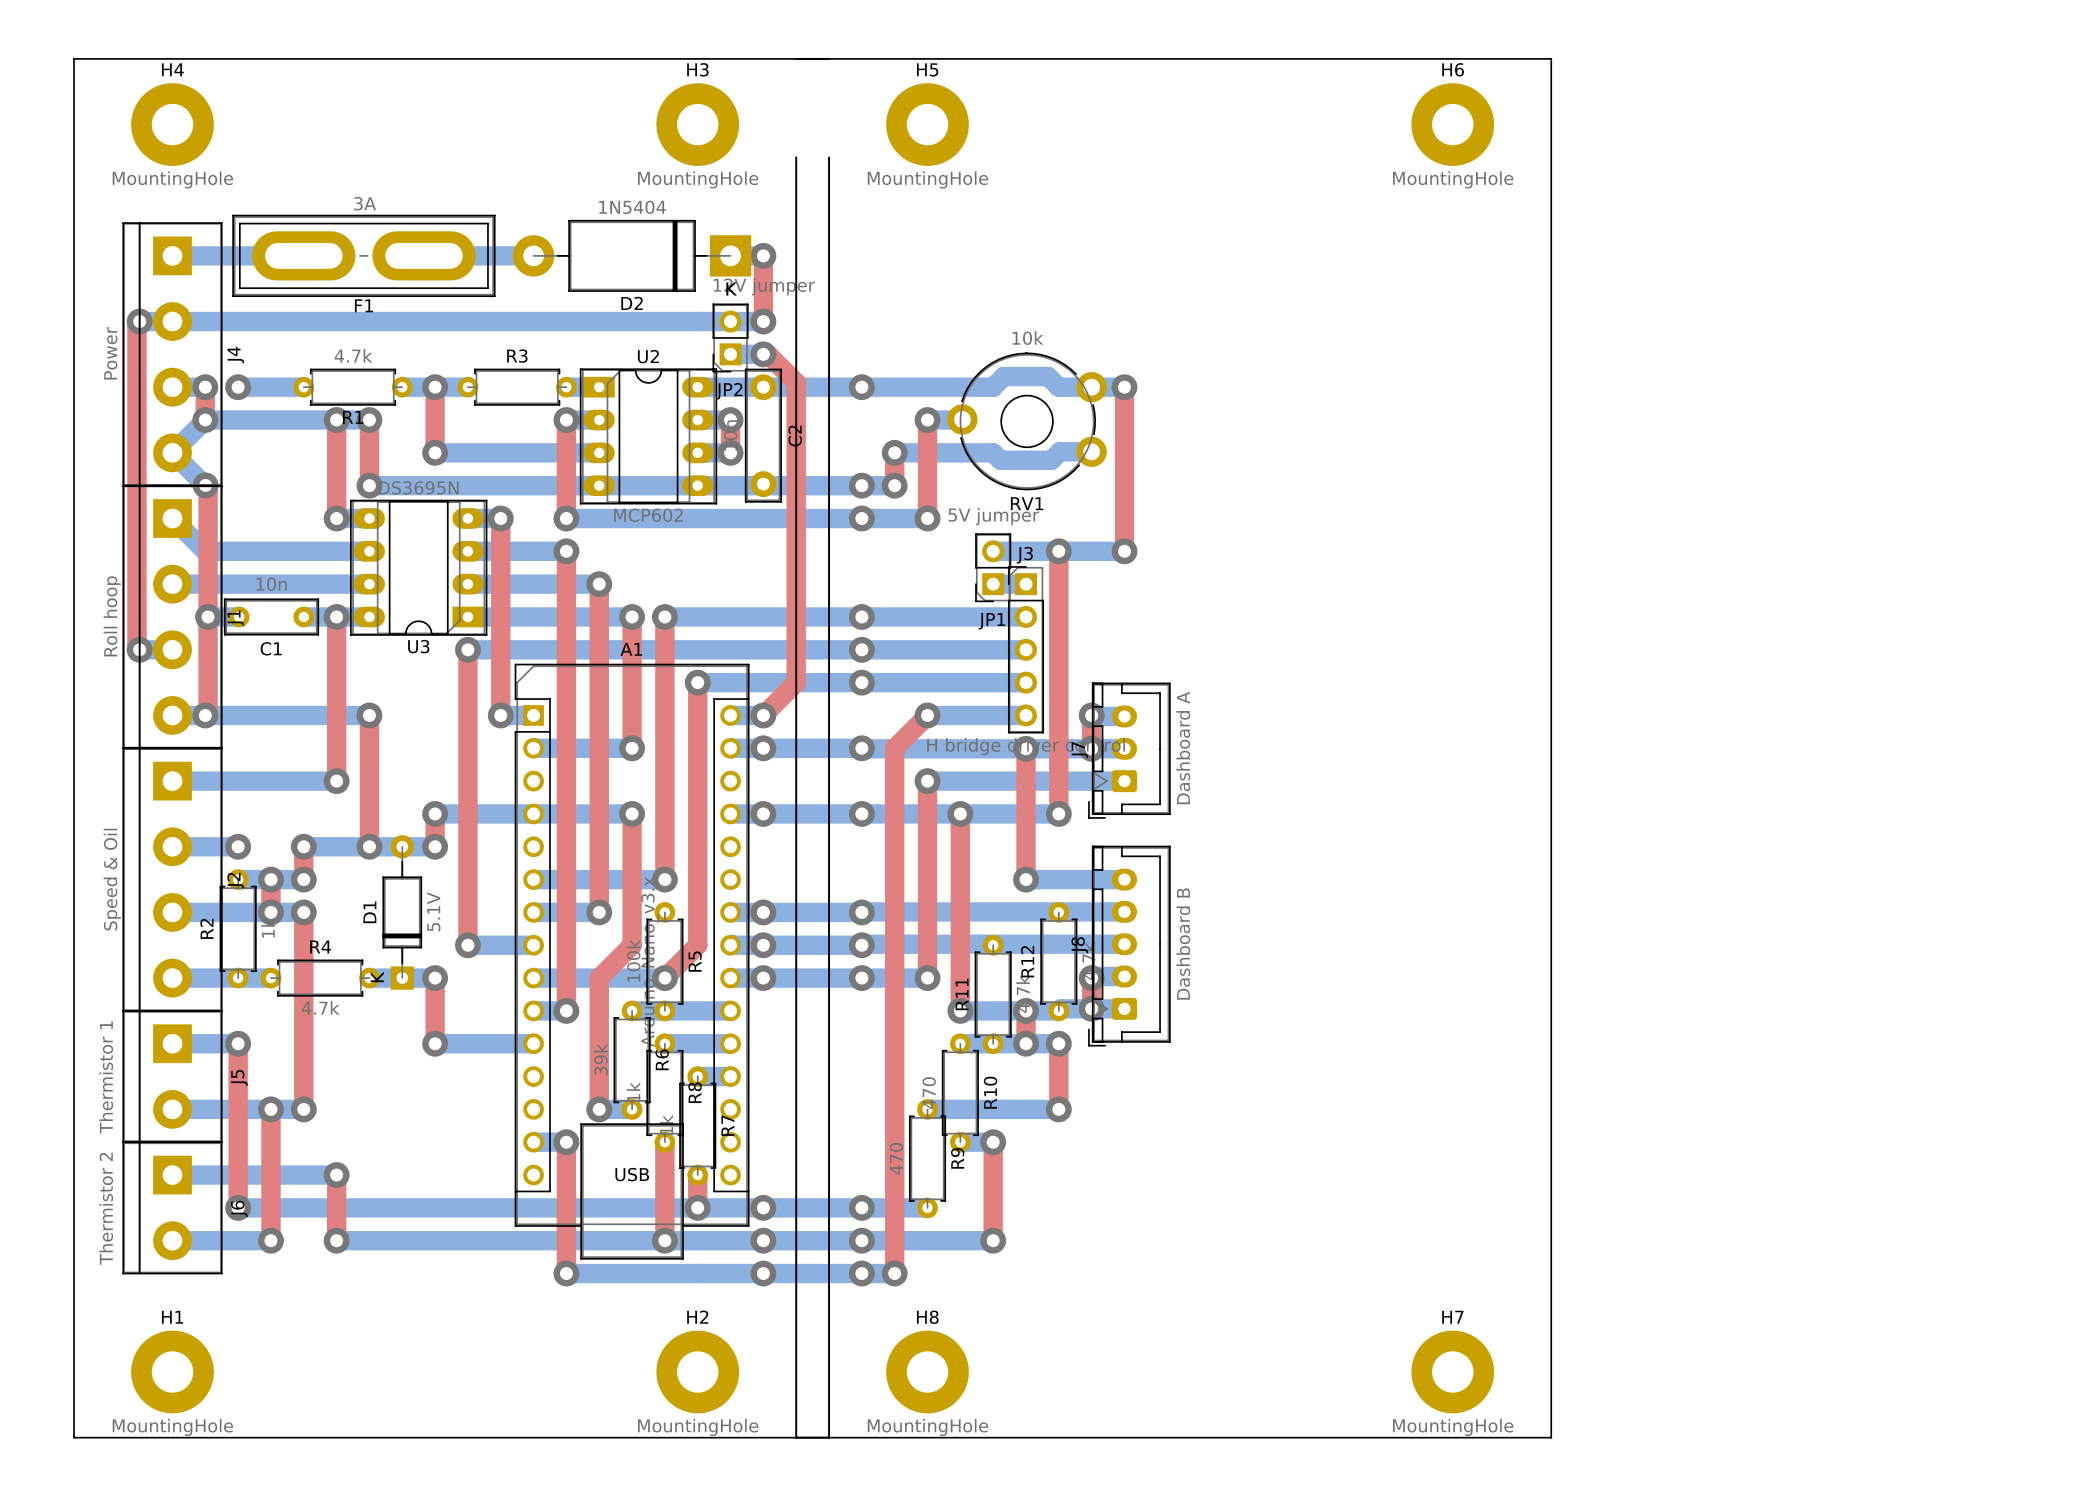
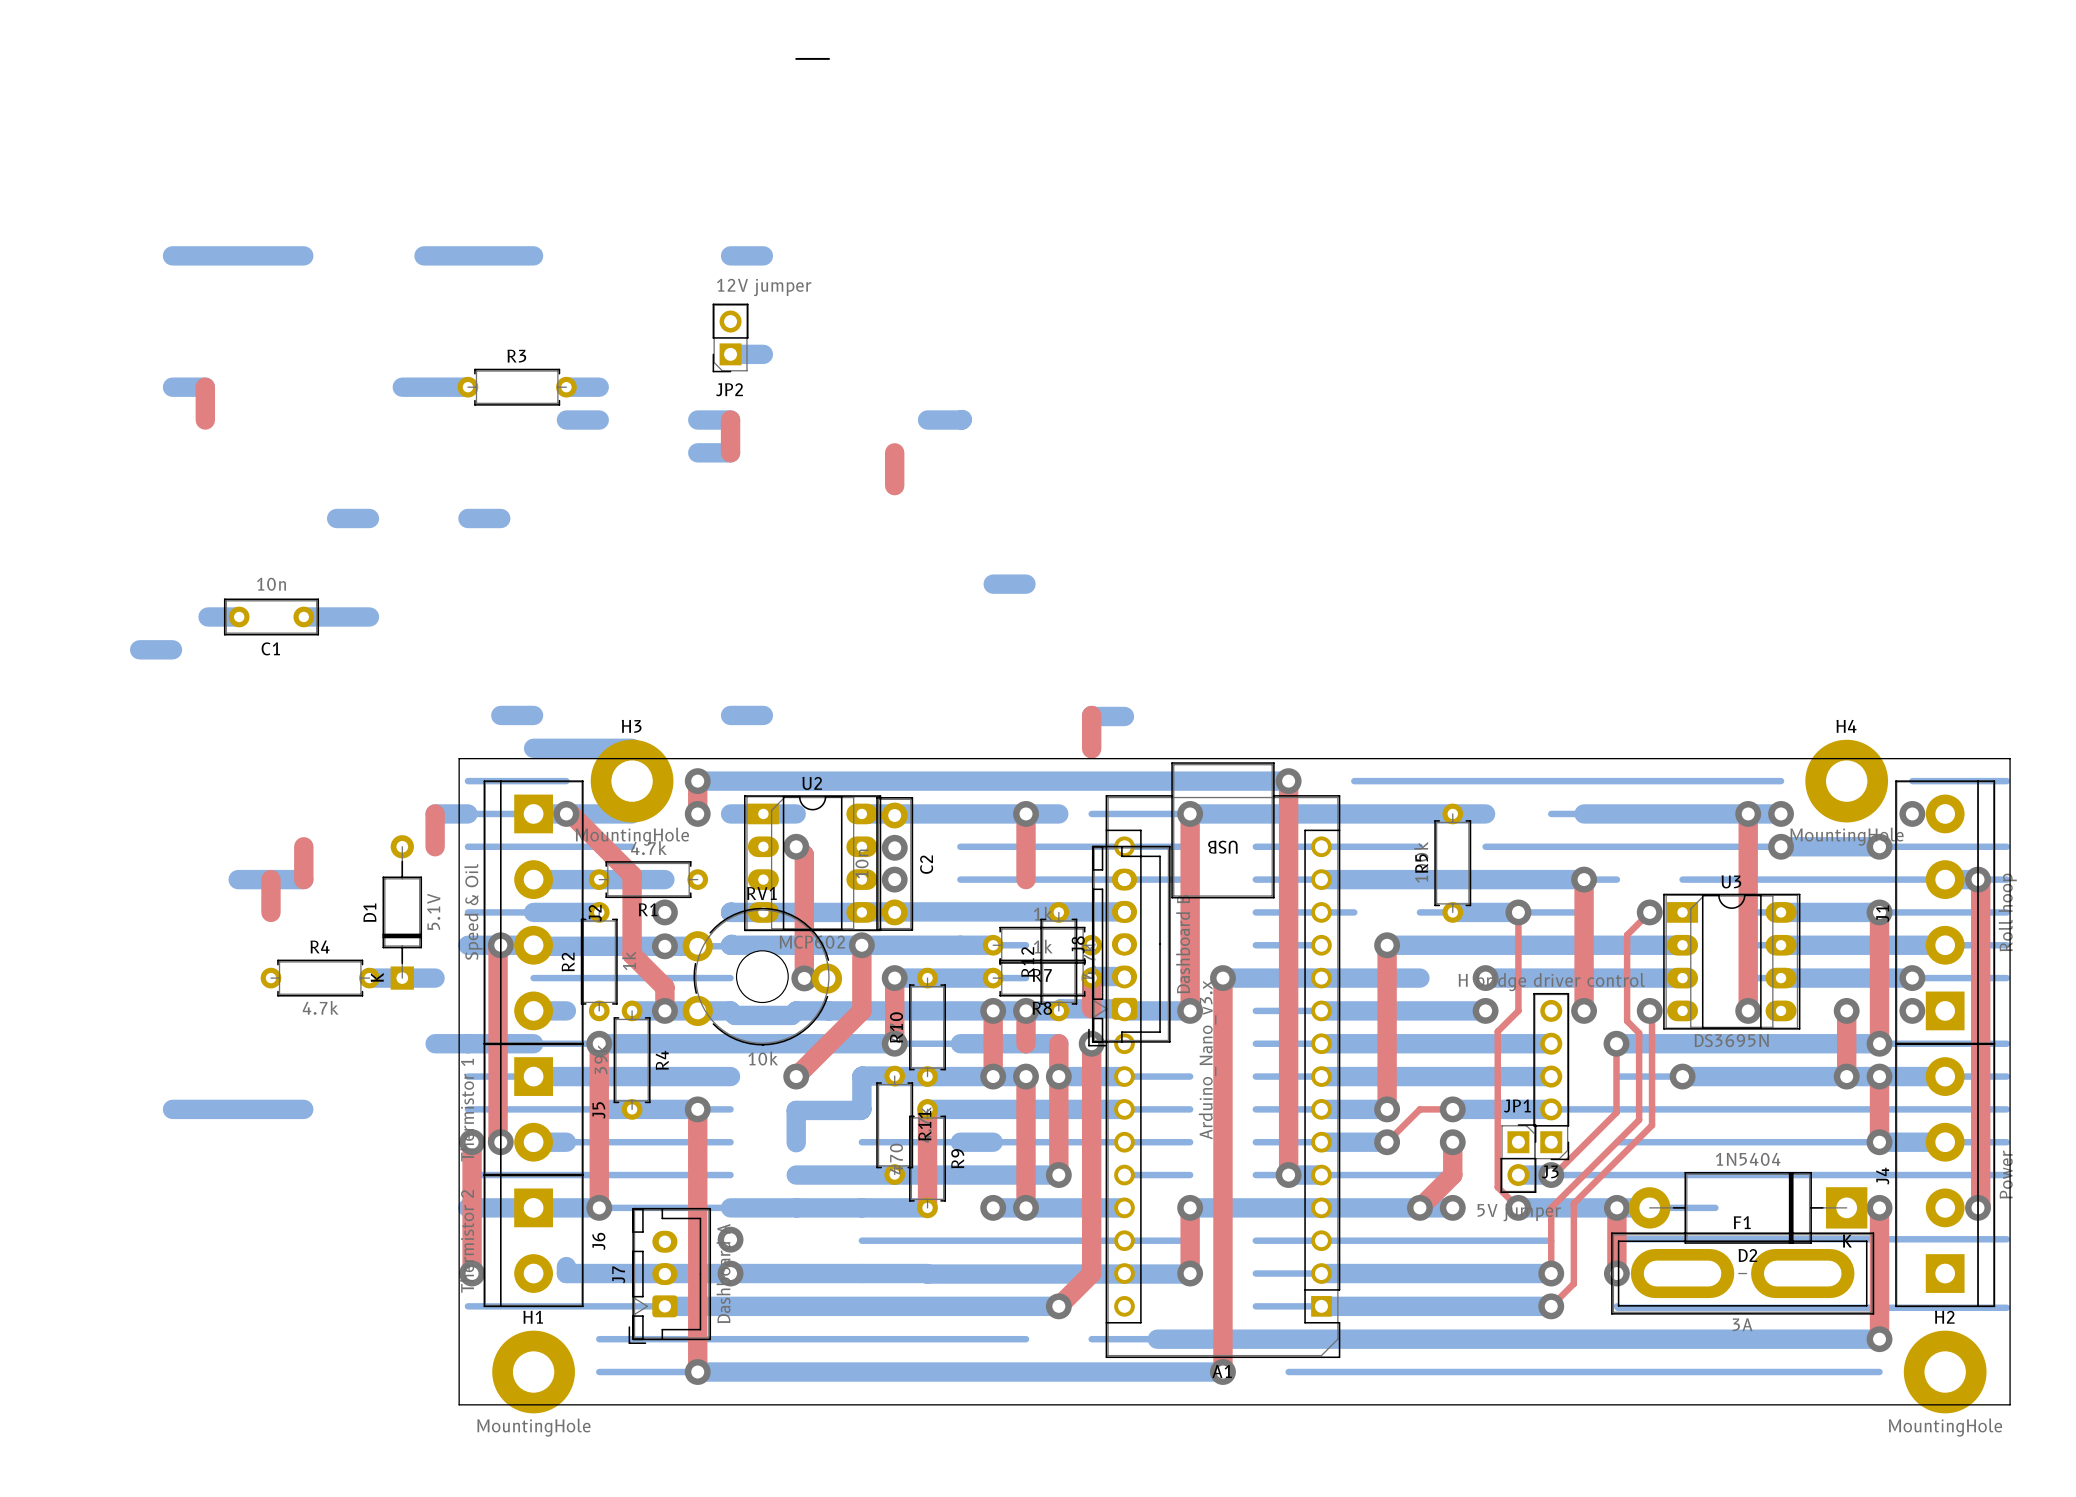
board edge: (74, 58) (1551, 58) (1551, 1437) (74, 1437) (74, 58) -> none
H4 position: (172, 124) -> (1846, 781)
H3 position: (697, 124) -> (632, 781)
H5: MountingHole (927, 124) -> none
H6: MountingHole (1452, 124) -> none
line: (796, 157) (796, 1437) (829, 1437) (829, 157) -> none
F1 value position: 3A (365, 203) -> 3A (1742, 1324)
F1 position: (363, 255) -> (1742, 1273)
D2 position: (632, 255) -> (1748, 1207)
top track: (763, 255) (763, 321) -> none
via: (763, 255) -> none
F1 name position: F1 (363, 305) -> F1 (1742, 1222)
top track: (139, 321) (136, 324) (136, 647) (139, 649) -> none
bottom track: (139, 321) (763, 321) -> none
via: (139, 321) -> none
via: (763, 321) -> none
J4 rotation: 0° (172, 354) -> 180° (1945, 1175)
J4 position: (172, 354) -> (1945, 1175)
top track: (763, 354) (767, 354) (796, 382) (796, 682) (763, 715) -> none
via: (763, 354) -> none
via: (205, 387) -> none
bottom track: (238, 387) (303, 387) -> none
via: (238, 387) -> none
R1 position: (353, 387) -> (648, 879)
top track: (435, 387) (435, 452) -> none
via: (435, 387) -> none
bottom track: (697, 387) (993, 387) (1003, 376) (1048, 376) (1058, 387) (1124, 387) -> none
via: (861, 387) -> none
top track: (1124, 387) (1124, 551) -> none
via: (1124, 387) -> none
via: (205, 420) -> none
top track: (336, 420) (336, 518) -> none
via: (336, 420) -> none
top track: (369, 420) (369, 485) -> none
bottom track: (369, 420) (205, 420) (172, 452) (205, 485) -> none
via: (369, 420) -> none
top track: (566, 420) (566, 518) -> none
via: (566, 420) -> none
via: (730, 420) -> none
top track: (927, 420) (927, 518) -> none
via: (927, 420) -> none
RV1 rotation: 0° (1027, 421) -> 180° (762, 976)
RV1 position: (1027, 421) -> (762, 976)
C2 position: (763, 435) -> (894, 863)
U2 position: (648, 436) -> (812, 863)
bottom track: (1091, 451) (1059, 451) (1051, 460) (1000, 460) (993, 452) (894, 452) -> none
bottom track: (435, 452) (599, 452) -> none
via: (435, 452) -> none
via: (730, 452) -> none
via: (894, 452) -> none
top track: (205, 485) (208, 487) (208, 712) (205, 715) -> none
via: (205, 485) -> none
bottom track: (369, 485) (894, 485) -> none
via: (369, 485) -> none
via: (861, 485) -> none
via: (894, 485) -> none
bottom track: (172, 518) (205, 551) (369, 551) -> none
via: (336, 518) -> none
top track: (500, 518) (500, 715) -> none
via: (500, 518) -> none
bottom track: (566, 518) (927, 518) -> none
via: (566, 518) -> none
via: (861, 518) -> none
via: (927, 518) -> none
bottom track: (467, 551) (566, 551) -> (467, 781) (566, 781)
top track: (566, 551) (566, 1010) -> none
via: (566, 551) -> none
bottom track: (993, 551) (1124, 551) -> none
top track: (1058, 551) (1058, 813) -> none
via: (1058, 551) -> none
via: (1124, 551) -> none
U3 rotation: 0° (418, 567) -> 180° (1731, 961)
U3 position: (418, 567) -> (1731, 961)
JP1 rotation: 0° (993, 567) -> 180° (1518, 1158)
JP1 position: (993, 567) -> (1518, 1158)
bottom track: (172, 584) (369, 584) -> none
bottom track: (467, 584) (599, 584) -> none
top track: (599, 584) (599, 912) -> none
via: (599, 584) -> none
J1 rotation: 0° (172, 616) -> 180° (1945, 912)
J1 position: (172, 616) -> (1945, 912)
via: (208, 616) -> none
top track: (336, 616) (336, 781) -> none
via: (336, 616) -> none
bottom track: (467, 616) (632, 616) -> (467, 846) (632, 846)
top track: (632, 616) (632, 748) -> none
via: (632, 616) -> none
top track: (664, 616) (664, 879) -> none
bottom track: (664, 616) (1026, 616) -> none
via: (664, 616) -> none
via: (861, 616) -> none
via: (139, 649) -> none
top track: (467, 649) (467, 945) -> none
bottom track: (467, 649) (1026, 649) -> none
via: (467, 649) -> none
via: (861, 649) -> none
J3 rotation: 0° (1026, 649) -> 180° (1551, 1076)
J3 position: (1026, 649) -> (1551, 1076)
top track: (697, 682) (697, 781) -> none
bottom track: (697, 682) (1026, 682) -> none
via: (697, 682) -> none
via: (861, 682) -> none
bottom track: (172, 715) (369, 715) -> none
via: (205, 715) -> none
top track: (369, 715) (369, 846) -> none
via: (369, 715) -> none
via: (500, 715) -> none
via: (763, 715) -> none
top track: (927, 715) (894, 748) (894, 978) -> none
bottom track: (927, 715) (1026, 715) -> none
via: (927, 715) -> none
via: (1091, 715) -> none
via: (632, 748) -> none
bottom track: (731, 748) (1124, 748) -> none
via: (763, 748) -> none
via: (861, 748) -> none
top track: (1026, 748) (1026, 813) -> none
via: (1026, 748) -> none
via: (1091, 748) -> none
J7 position: (1129, 750) -> (669, 1275)
board edge: none -> (459, 758) (2010, 758) (2010, 1404) (459, 1404) (459, 758)
bottom track: (172, 781) (336, 781) -> none
via: (336, 781) -> none
bottom track: none -> (697, 781) (927, 781)
via: none -> (697, 781)
top track: (927, 781) (927, 978) -> none
via: (927, 781) -> none
bottom track: none -> (1124, 781) (1288, 781)
top track: none -> (1288, 781) (1288, 1175)
via: none -> (1288, 781)
bottom track: none -> (1354, 781) (1781, 781)
bottom track: none -> (1912, 781) (2006, 781)
via: (435, 813) -> none
bottom track width: thick (467, 813) (533, 813) -> thin (467, 813) (533, 813)
via: none -> (566, 813)
top track: (632, 813) (632, 875) -> (566, 813) (570, 813) (632, 875)
via: (632, 813) -> none
top track: (697, 813) (697, 945) (664, 978) -> none
via: none -> (697, 813)
via: (763, 813) -> none
bottom track: (796, 813) (861, 813) -> (960, 879) (1026, 879)
via: (861, 813) -> none
top track: (960, 813) (960, 1010) -> (1190, 813) (1190, 1010)
via: (960, 813) -> none
via: none -> (1026, 813)
via: (1058, 813) -> none
bottom track: none -> (1091, 813) (1485, 813)
via: none -> (1190, 813)
bottom track: none -> (1551, 813) (1781, 813)
top track: none -> (1748, 813) (1748, 1010)
via: none -> (1748, 813)
via: none -> (1781, 813)
via: none -> (1912, 813)
bottom track: (172, 846) (238, 846) -> (467, 912) (533, 912)
via: (238, 846) -> none
bottom track: (303, 846) (435, 846) -> (467, 1109) (599, 1109)
via: (303, 846) -> none
via: (369, 846) -> none
via: (435, 846) -> none
top track: none -> (796, 846) (804, 854) (804, 978)
via: none -> (796, 846)
bottom track: none -> (960, 846) (1190, 846)
bottom track: none -> (1255, 846) (1419, 846)
bottom track: none -> (1485, 846) (2006, 846)
via: none -> (1781, 846)
via: none -> (1879, 846)
via: none -> (894, 847)
J2 position: (172, 879) -> (533, 912)
via: (270, 879) -> none
via: (303, 879) -> none
via: (664, 879) -> none
via: none -> (894, 879)
bottom track width: thick (1026, 879) (1124, 879) -> thin (1026, 879) (1124, 879)
via: (1026, 879) -> none
bottom track: none -> (1124, 879) (1190, 879)
bottom track: none -> (1255, 879) (1616, 879)
top track: none -> (1584, 879) (1584, 1010)
via: none -> (1584, 879)
bottom track: none -> (1682, 879) (2006, 879)
top track: none -> (1978, 879) (1980, 882) (1980, 1205) (1978, 1207)
via: none -> (1978, 879)
bottom track: (172, 912) (303, 912) -> none
via: (270, 912) -> none
top track: (303, 912) (303, 1109) -> none
via: (303, 912) -> none
via: (599, 912) -> none
via: none -> (664, 912)
via: (763, 912) -> none
via: (861, 912) -> none
bottom track: none -> (1255, 912) (1354, 912)
bottom track: none -> (1419, 912) (1584, 912)
top track: none -> (1518, 912) (1518, 1010) (1497, 1031) (1497, 1187) (1518, 1207)
via: none -> (1518, 912)
top track: none -> (1649, 912) (1627, 935) (1627, 1021) (1639, 1033) (1639, 1120) (1551, 1207) (1551, 1273)
via: none -> (1649, 912)
bottom track: none -> (1748, 912) (2006, 912)
top track: none -> (1879, 912) (1879, 1043)
via: none -> (1879, 912)
R2 position: (238, 928) -> (599, 961)
bottom track: (1124, 944) (861, 945) -> (1026, 945) (861, 945)
via position: (467, 945) -> (500, 945)
top track: none -> (500, 945) (498, 947) (498, 1139) (500, 1142)
bottom track: none -> (533, 945) (729, 946)
top track: (632, 945) (599, 978) (599, 1043) -> (632, 945) (632, 954) (664, 987) (664, 1010)
via: (763, 945) -> none
top track: none -> (861, 945) (861, 1010) (796, 1076)
bottom track: none -> (1255, 945) (1321, 945)
top track: none -> (1387, 945) (1387, 1109)
bottom track: none -> (1387, 945) (1682, 945)
via: none -> (1387, 945)
bottom track: none -> (1748, 945) (2006, 945)
via: none -> (664, 946)
A1 rotation: 0° (632, 961) -> 180° (1222, 1060)
A1 position: (632, 961) -> (1222, 1060)
R5 position: (664, 961) -> (1452, 863)
R5 name position: R5 (695, 961) -> R5 (1421, 863)
bottom track: (172, 978) (270, 978) -> none
top track: (435, 978) (435, 1043) -> (697, 1109) (697, 1175)
via: (435, 978) -> none
bottom track width: thick (533, 978) (664, 978) -> thin (533, 978) (664, 978)
via: (664, 978) -> none
bottom track: (730, 978) (894, 978) -> (730, 978) (664, 978)
via: (763, 978) -> none
via: none -> (804, 978)
via: (861, 978) -> none
via: none -> (894, 978)
bottom track: none -> (927, 978) (1026, 978)
via: (927, 978) -> none
via: (1091, 978) -> none
top track: none -> (1222, 978) (1222, 1372)
bottom track: none -> (1222, 978) (1419, 978)
via: none -> (1222, 978)
bottom track: none -> (1485, 978) (1682, 978)
via: none -> (1485, 978)
bottom track: none -> (1748, 978) (2006, 978)
via: none -> (1912, 978)
R11 name position: R11 (962, 994) -> R11 (924, 1125)
R11 position: (993, 994) -> (894, 1125)
via: (1091, 1008) -> none
via: (566, 1010) -> none
via: none -> (664, 1010)
bottom track: none -> (730, 1010) (735, 1015) (791, 1015) (796, 1010) (960, 1010)
via: (960, 1010) -> none
top track: none -> (993, 1010) (993, 1076)
via: none -> (993, 1010)
bottom track: none -> (1091, 1010) (1190, 1010)
via: none -> (1190, 1010)
bottom track: none -> (1255, 1010) (1485, 1010)
via: none -> (1485, 1010)
via: none -> (1584, 1010)
top track: none -> (1649, 1010) (1652, 1013) (1652, 1125) (1573, 1203) (1573, 1283) (1551, 1306)
via: none -> (1649, 1010)
via: none -> (1748, 1010)
top track: none -> (1846, 1010) (1846, 1076)
via: none -> (1846, 1010)
via: none -> (1912, 1010)
bottom track: (172, 1043) (238, 1043) -> none
top track: (238, 1043) (238, 1207) -> none
via: (238, 1043) -> none
via: (435, 1043) -> none
bottom track: none -> (533, 1043) (664, 1043)
via: none -> (599, 1043)
bottom track: none -> (730, 1043) (960, 1043)
top track: (894, 1043) (894, 1273) -> none
via: none -> (894, 1043)
via: (1026, 1043) -> none
via: (1058, 1043) -> none
top track: none -> (1091, 1043) (1091, 1273) (1058, 1306)
via: none -> (1091, 1043)
bottom track: none -> (1255, 1043) (1551, 1043)
top track: none -> (1616, 1043) (1616, 1112) (1554, 1175) (1551, 1175)
bottom track: none -> (1616, 1043) (2006, 1043)
via: none -> (1616, 1043)
via: none -> (1879, 1043)
R6 name: R6 (662, 1059) -> R4 (662, 1060)
J5 position: (172, 1076) -> (533, 1109)
bottom track: none -> (467, 1076) (697, 1076)
via: none -> (796, 1076)
via: none -> (993, 1076)
top track: none -> (1026, 1076) (1026, 1207)
bottom track: none -> (1026, 1076) (862, 1076) (861, 1109) (796, 1110) (796, 1142)
via: none -> (1026, 1076)
bottom track: none -> (1058, 1076) (1190, 1076)
via: none -> (1058, 1076)
bottom track: none -> (1255, 1076) (1551, 1076)
bottom track: none -> (1616, 1076) (2006, 1076)
via: none -> (1682, 1076)
via: none -> (1846, 1076)
top track: none -> (1879, 1076) (1879, 1142)
via: none -> (1879, 1076)
R8 rotation: 0° (664, 1092) -> 90° clockwise (1042, 978)
R8 position: (664, 1092) -> (1042, 978)
R10 position: (960, 1092) -> (927, 1027)
R10 name position: R10 (990, 1092) -> R10 (896, 1027)
top track: (270, 1109) (270, 1240) -> none
via: (270, 1109) -> none
via: (303, 1109) -> none
via: (599, 1109) -> none
bottom track: none -> (632, 1109) (730, 1109)
via: none -> (697, 1109)
top track: none -> (1058, 1109) (1058, 1175)
bottom track: none -> (1058, 1109) (1190, 1109)
via: (1058, 1109) -> none
bottom track: none -> (1255, 1109) (1387, 1109)
via: none -> (1387, 1109)
top track: none -> (1452, 1109) (1419, 1109) (1387, 1142)
bottom track: none -> (1452, 1109) (2006, 1109)
via: none -> (1452, 1109)
R7 rotation: 0° (697, 1125) -> 90° clockwise (1042, 945)
R7 position: (697, 1125) -> (1042, 945)
via: none -> (472, 1142)
via: none -> (500, 1142)
top track: (566, 1142) (566, 1273) -> (472, 1142) (472, 1273)
bottom track: none -> (566, 1142) (730, 1142)
via: (566, 1142) -> none
top track: (664, 1142) (664, 1240) -> (599, 1109) (599, 1207)
bottom track: none -> (861, 1142) (960, 1142)
top track: (993, 1142) (993, 1240) -> (927, 1109) (927, 1207)
bottom track: none -> (993, 1142) (1190, 1142)
via: (993, 1142) -> none
bottom track: none -> (1255, 1142) (1387, 1142)
via: none -> (1387, 1142)
top track: none -> (1452, 1142) (1452, 1175) (1419, 1207)
via: none -> (1452, 1142)
bottom track: none -> (1616, 1142) (2006, 1142)
via: none -> (1879, 1142)
bottom track: (172, 1175) (336, 1175) -> none
top track: (336, 1175) (336, 1240) -> none
via: (336, 1175) -> none
bottom track: none -> (467, 1175) (730, 1175)
bottom track: none -> (796, 1175) (1058, 1175)
via: none -> (1058, 1175)
bottom track: none -> (1124, 1175) (1190, 1175)
bottom track: none -> (1255, 1175) (1452, 1175)
via: none -> (1288, 1175)
bottom track: none -> (1518, 1175) (2006, 1175)
via: none -> (1551, 1175)
J6 position: (172, 1207) -> (533, 1240)
bottom track: (238, 1207) (467, 1207) -> none
via: (238, 1207) -> none
bottom track width: thick (599, 1207) (730, 1207) -> thin (599, 1207) (730, 1207)
via: none -> (599, 1207)
top track: none -> (697, 1207) (697, 1372)
via: (697, 1207) -> none
via: (763, 1207) -> none
via: (861, 1207) -> none
bottom track: none -> (993, 1207) (1124, 1207)
via: none -> (993, 1207)
via: none -> (1026, 1207)
top track: none -> (1190, 1207) (1190, 1273)
bottom track: none -> (1190, 1207) (1452, 1207)
via: none -> (1190, 1207)
via: none -> (1419, 1207)
via: none -> (1452, 1207)
bottom track: none -> (1518, 1207) (1715, 1207)
via: none -> (1518, 1207)
top track: none -> (1616, 1207) (1616, 1273)
via: none -> (1616, 1207)
top track: none -> (1879, 1207) (1879, 1339)
via: none -> (1879, 1207)
via: none -> (1978, 1207)
via: none -> (730, 1239)
bottom track: none -> (2006, 1239) (1616, 1240)
bottom track: (172, 1240) (270, 1240) -> none
via: (270, 1240) -> none
bottom track: (336, 1240) (861, 1240) -> none
via: (336, 1240) -> none
via: (664, 1240) -> none
via: (763, 1240) -> none
bottom track width: thick (861, 1240) (993, 1240) -> thin (861, 1240) (993, 1240)
via: (861, 1240) -> none
bottom track: none -> (993, 1240) (1190, 1240)
via: (993, 1240) -> none
bottom track: none -> (1255, 1240) (1551, 1240)
via: none -> (472, 1273)
via: (566, 1273) -> none
via: none -> (730, 1273)
via: (763, 1273) -> none
via: (861, 1273) -> none
bottom track: none -> (894, 1273) (1190, 1273)
via: (894, 1273) -> none
via: none -> (1190, 1273)
bottom track: none -> (1255, 1273) (1551, 1273)
via: none -> (1551, 1273)
via: none -> (1616, 1273)
bottom track: none -> (467, 1306) (1058, 1306)
via: none -> (1058, 1306)
bottom track: none -> (1255, 1306) (1551, 1306)
via: none -> (1551, 1306)
bottom track: none -> (1616, 1306) (2006, 1307)
bottom track: none -> (599, 1339) (1026, 1339)
bottom track: none -> (1091, 1339) (1879, 1339)
via: none -> (1879, 1339)
H1 position: (172, 1372) -> (533, 1372)
bottom track: none -> (599, 1372) (1222, 1372)
H2 position: (697, 1372) -> (1945, 1372)
via: none -> (697, 1372)
H8: MountingHole (927, 1372) -> none
via: none -> (1222, 1372)
bottom track: none -> (1288, 1372) (1879, 1372)
H7: MountingHole (1452, 1372) -> none

